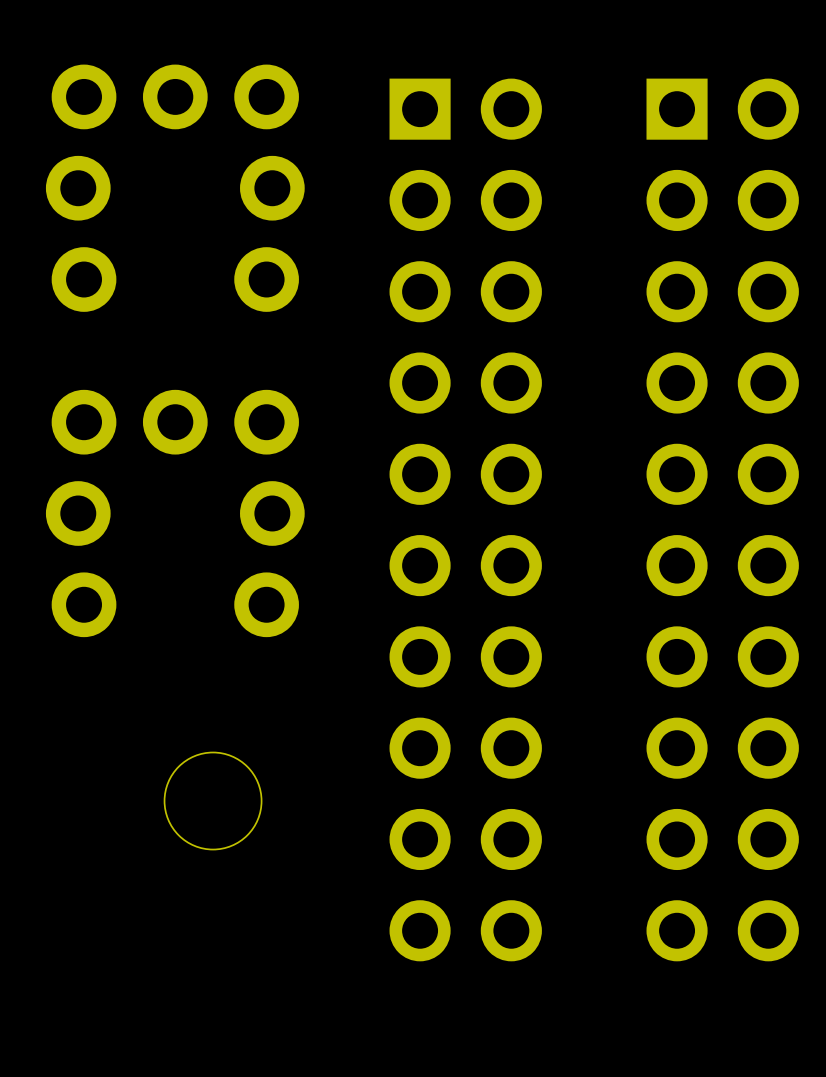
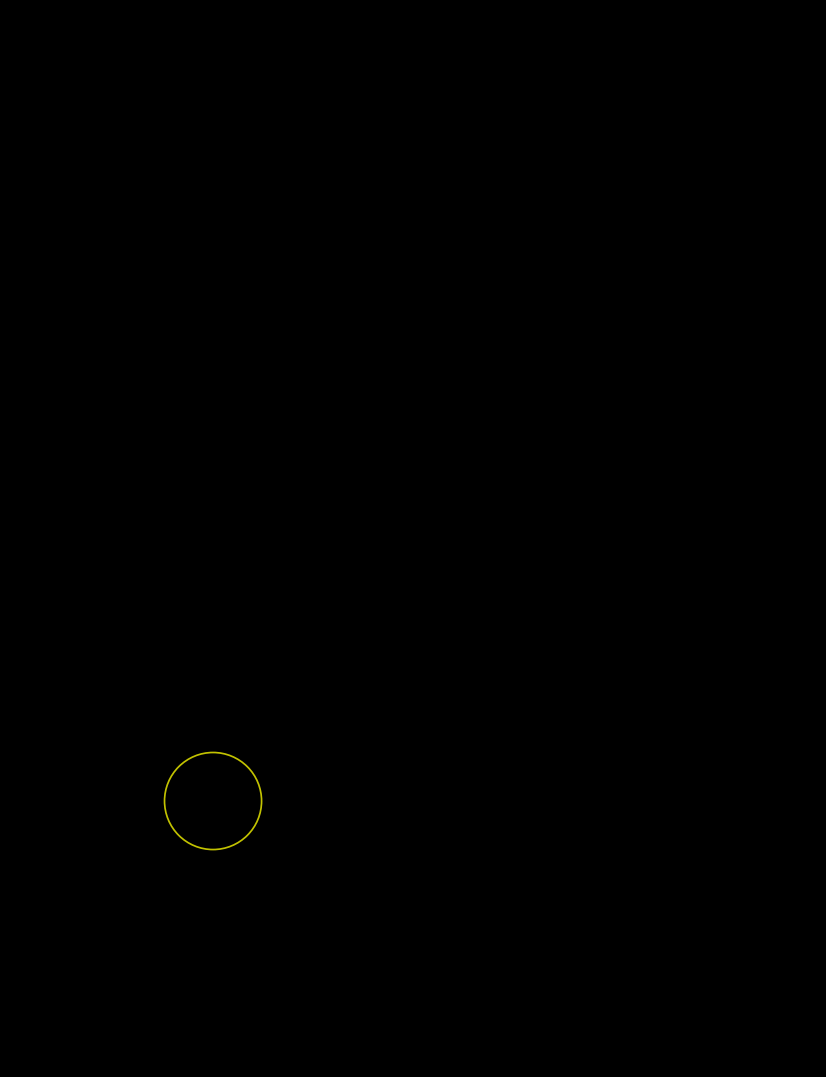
part: (175, 188) -> none
part: (175, 513) -> none
part: (465, 519) -> none
part: (722, 519) -> none

